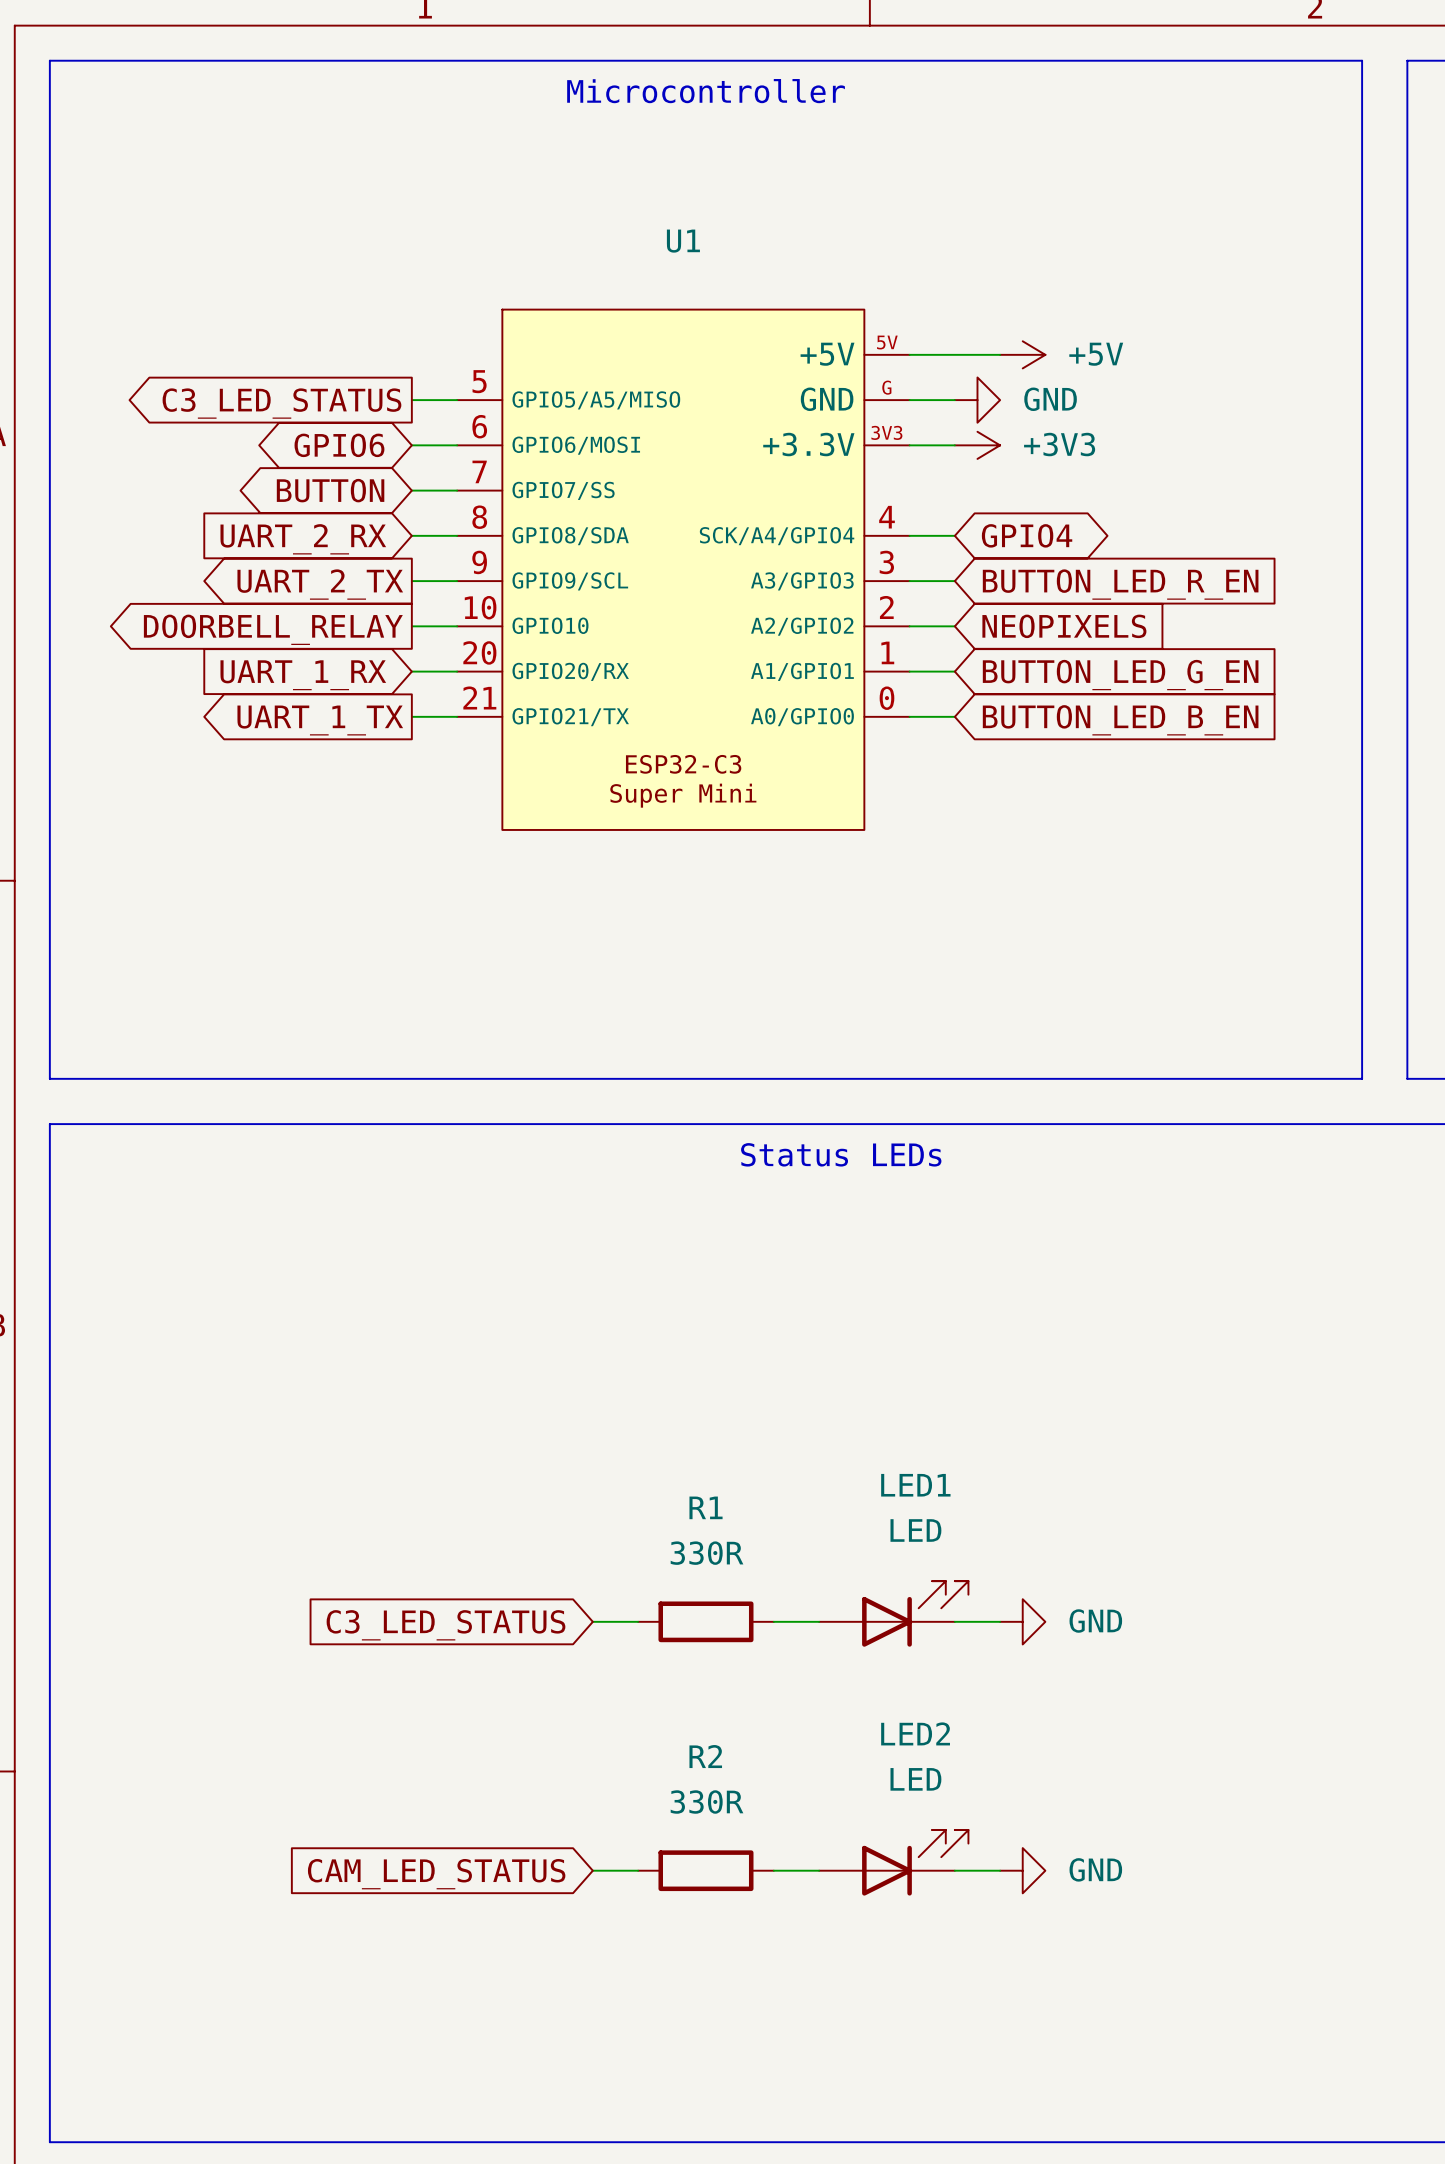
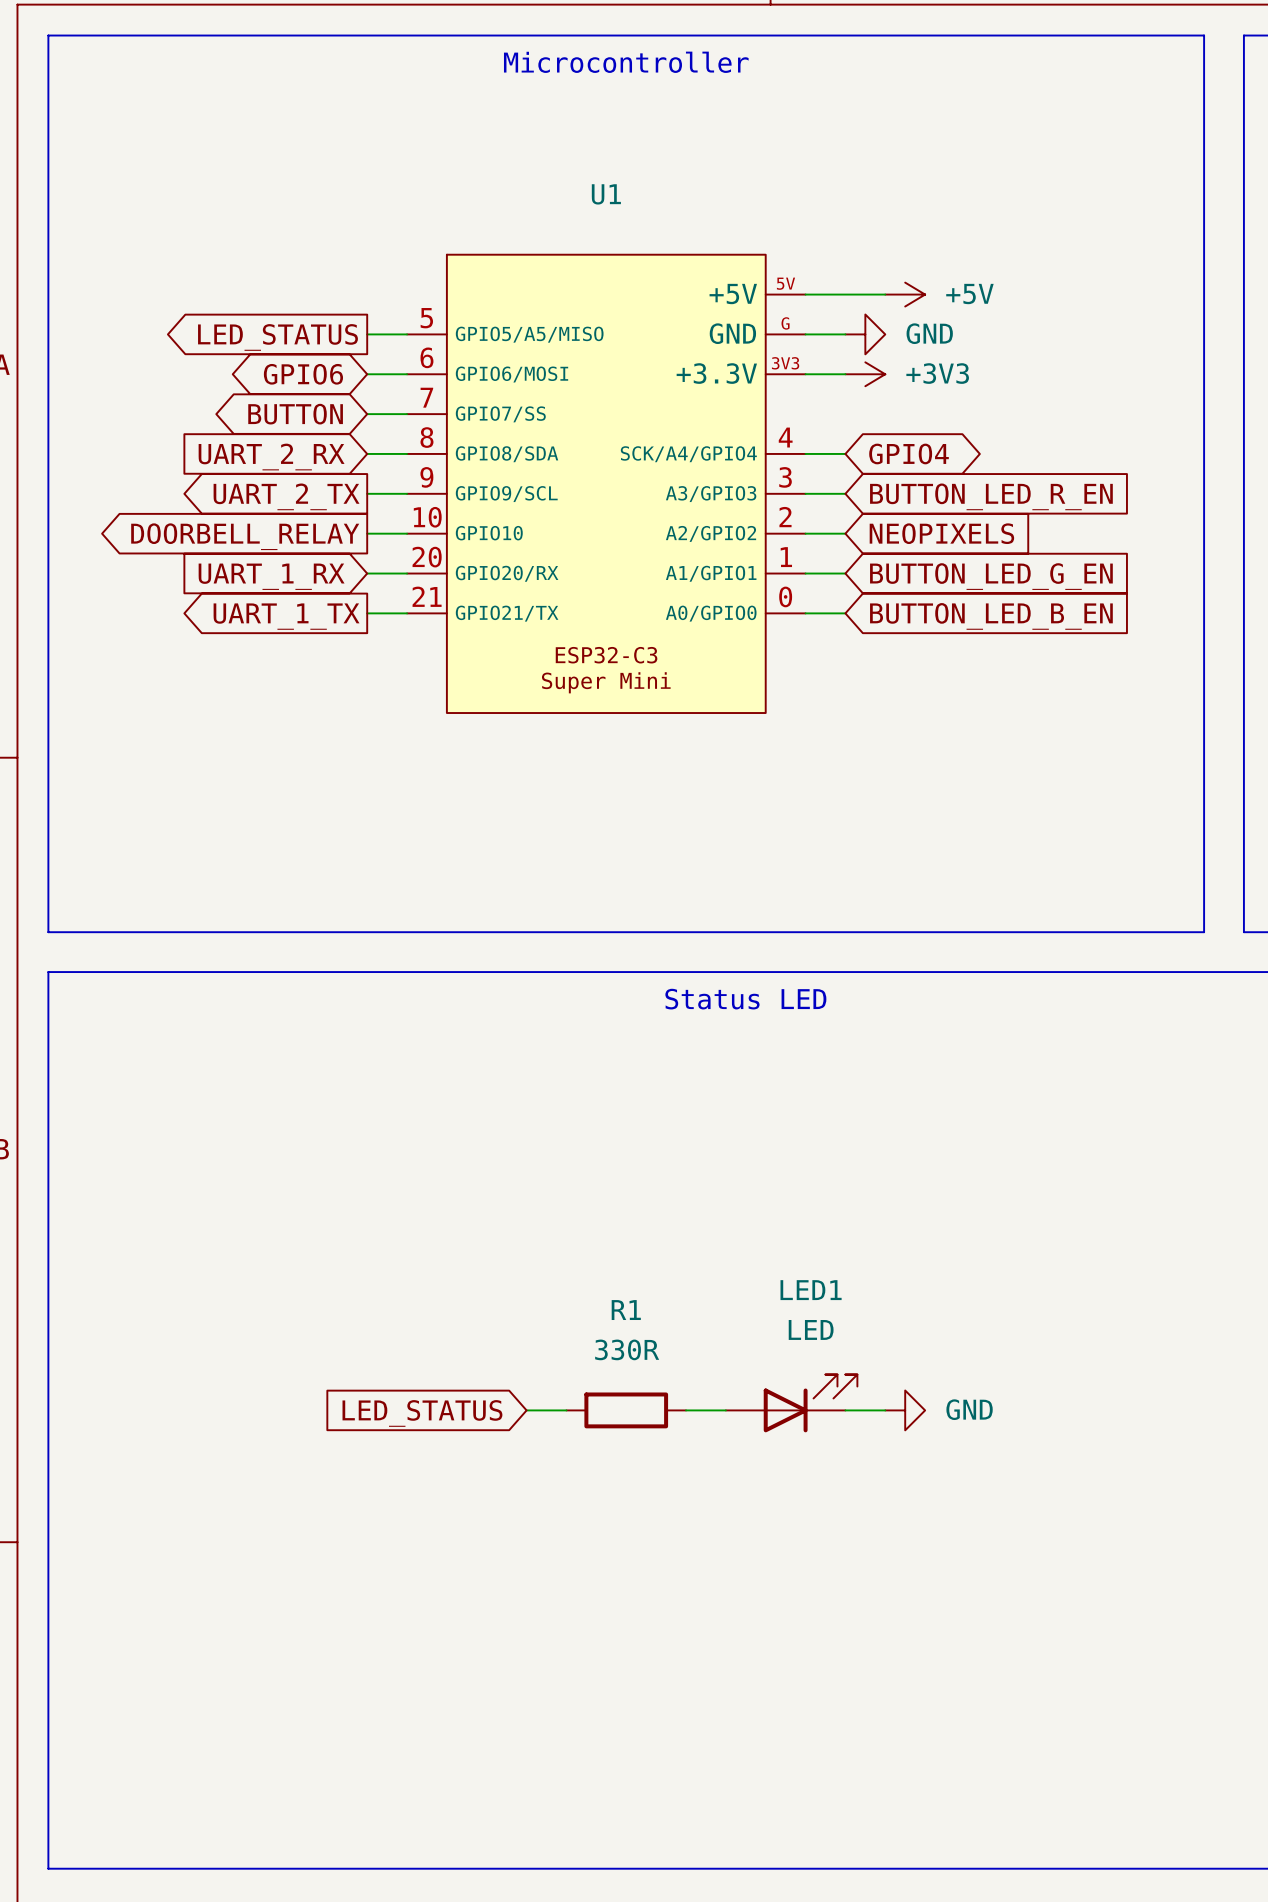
global label: C3_LED_STATUS (281, 403) -> LED_STATUS (277, 337)
text: Status LEDs (841, 1154) -> Status LED (745, 999)
global label: C3_LED_STATUS (445, 1625) -> LED_STATUS (422, 1413)
LED2: LED (893, 1862) -> none
wire: (592, 1870) (638, 1870) -> none
R2: 330R (705, 1870) -> none
wire: (773, 1870) (819, 1870) -> none
wire: (954, 1870) (1000, 1870) -> none
power symbol: GND (1022, 1870) -> none
global label: CAM_LED_STATUS (436, 1874) -> none

